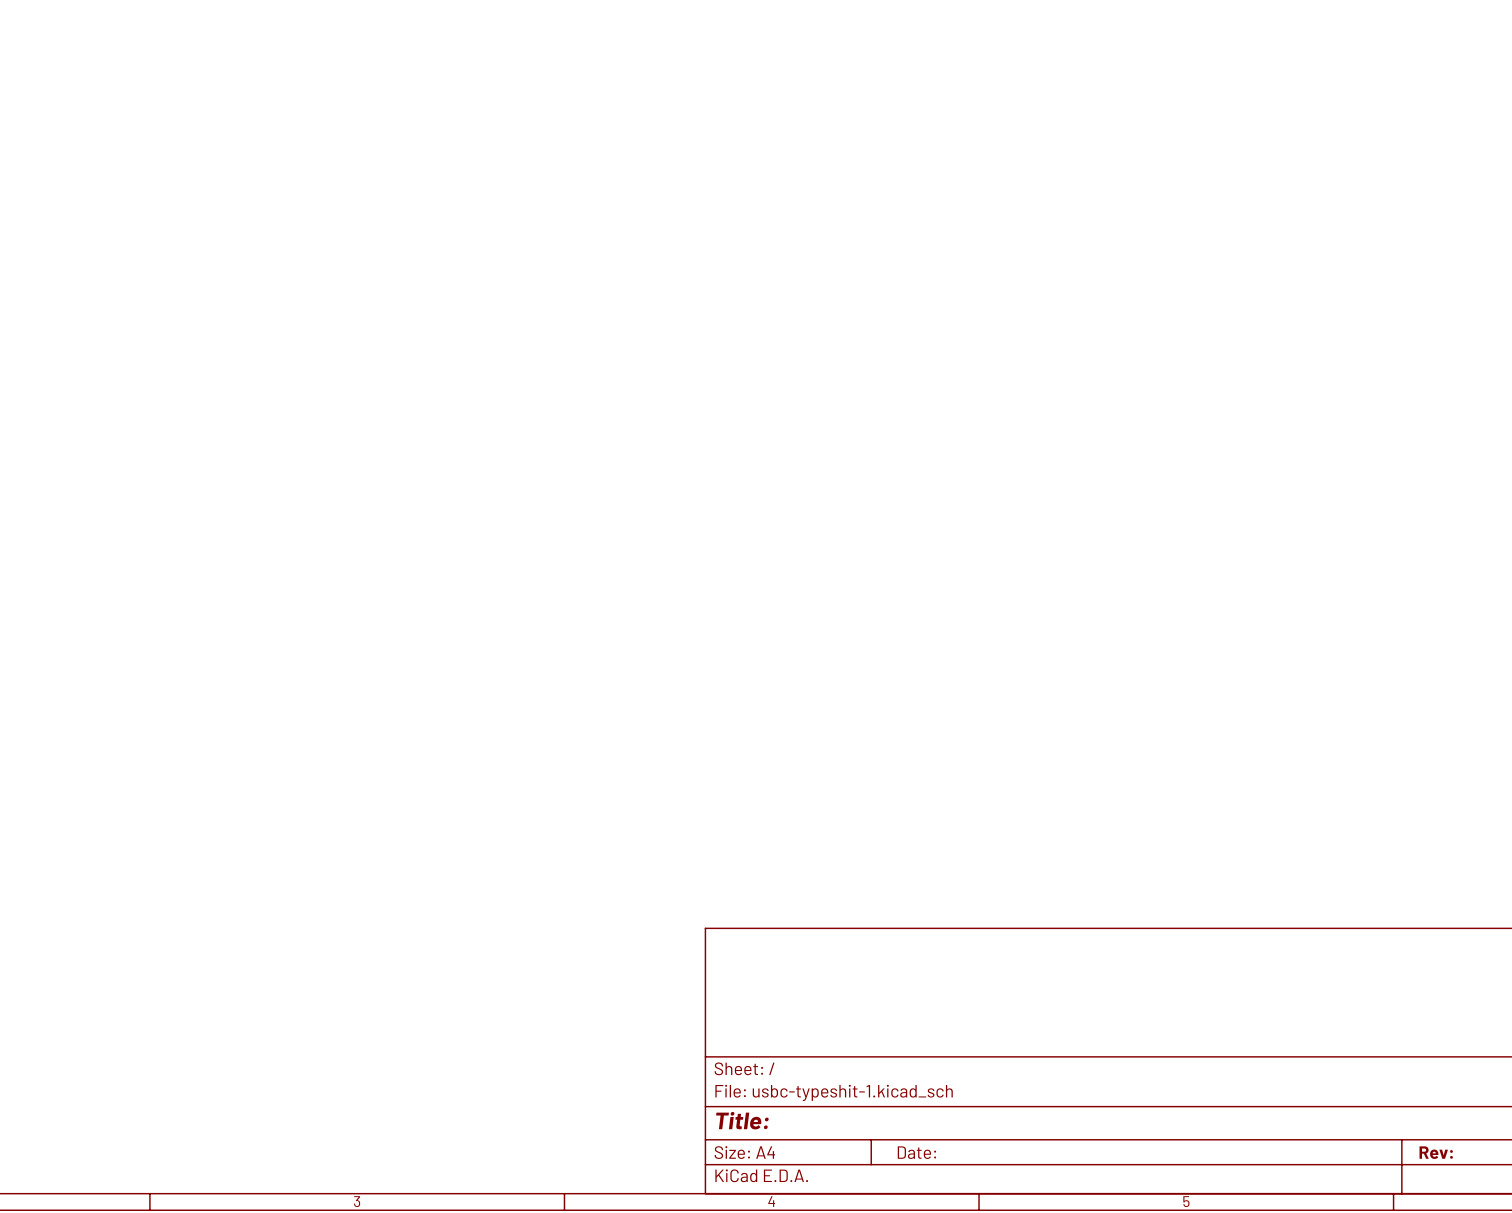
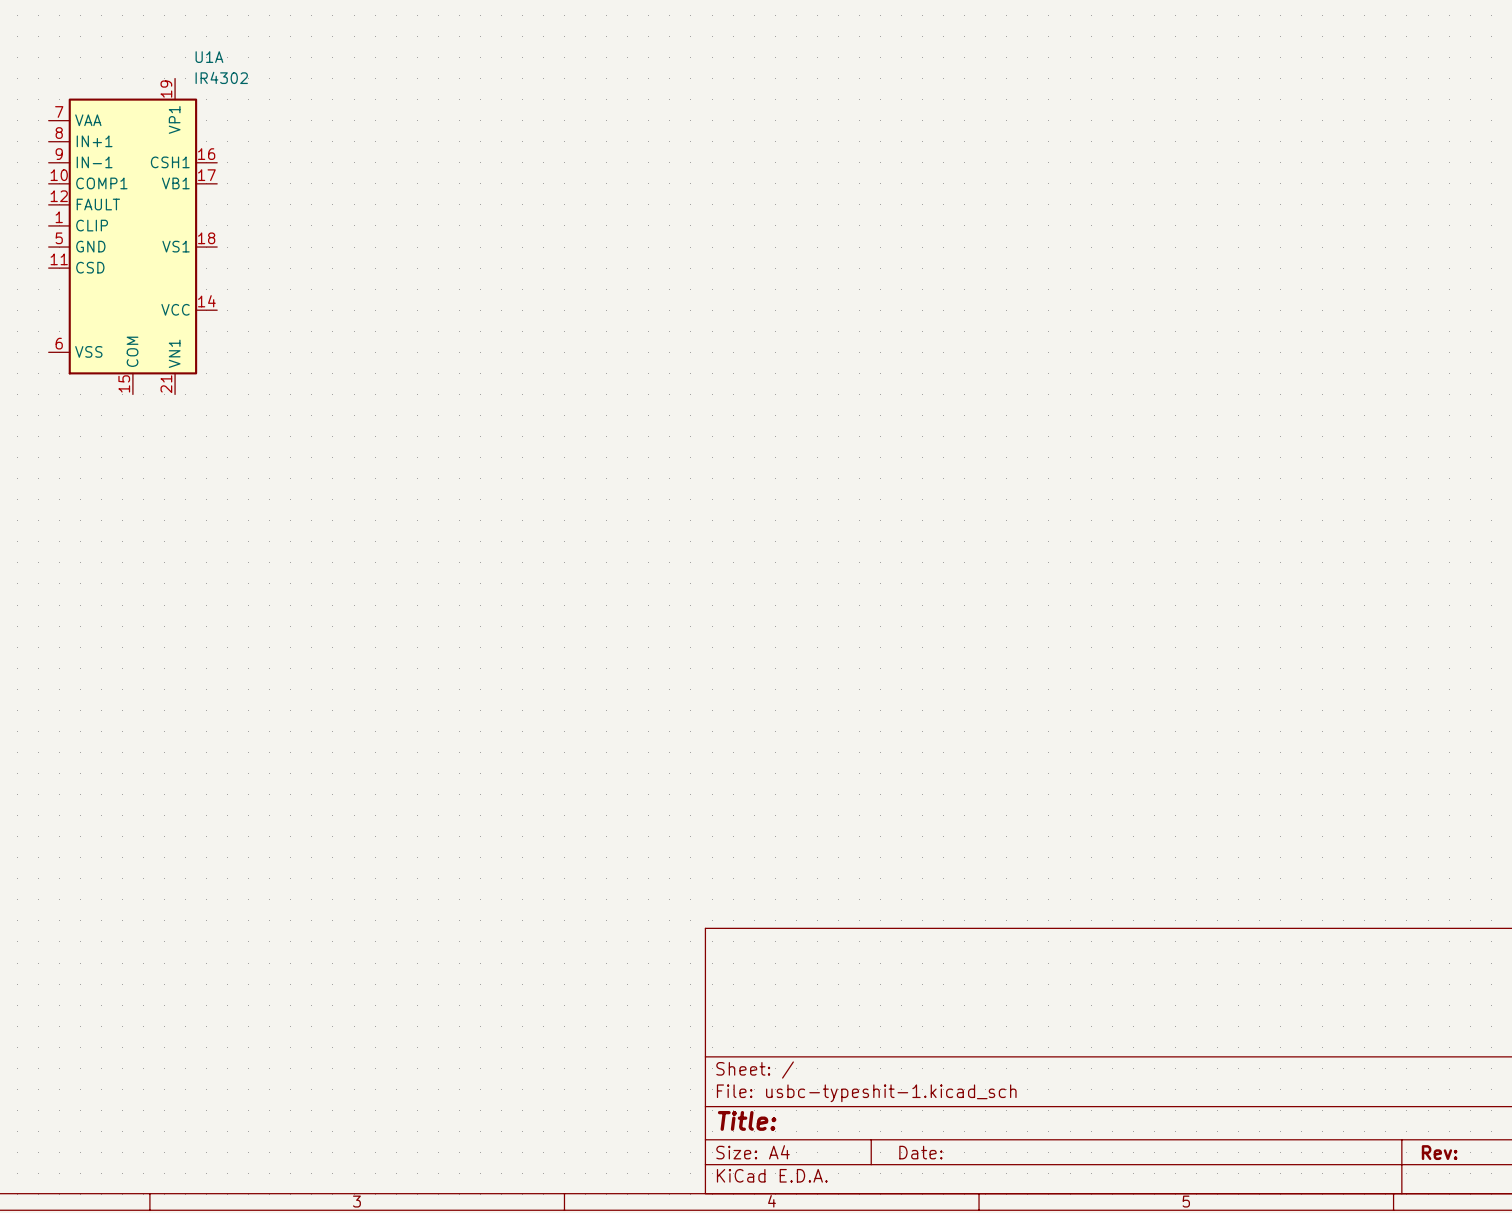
U1A: none -> IR4302 (132, 236)

